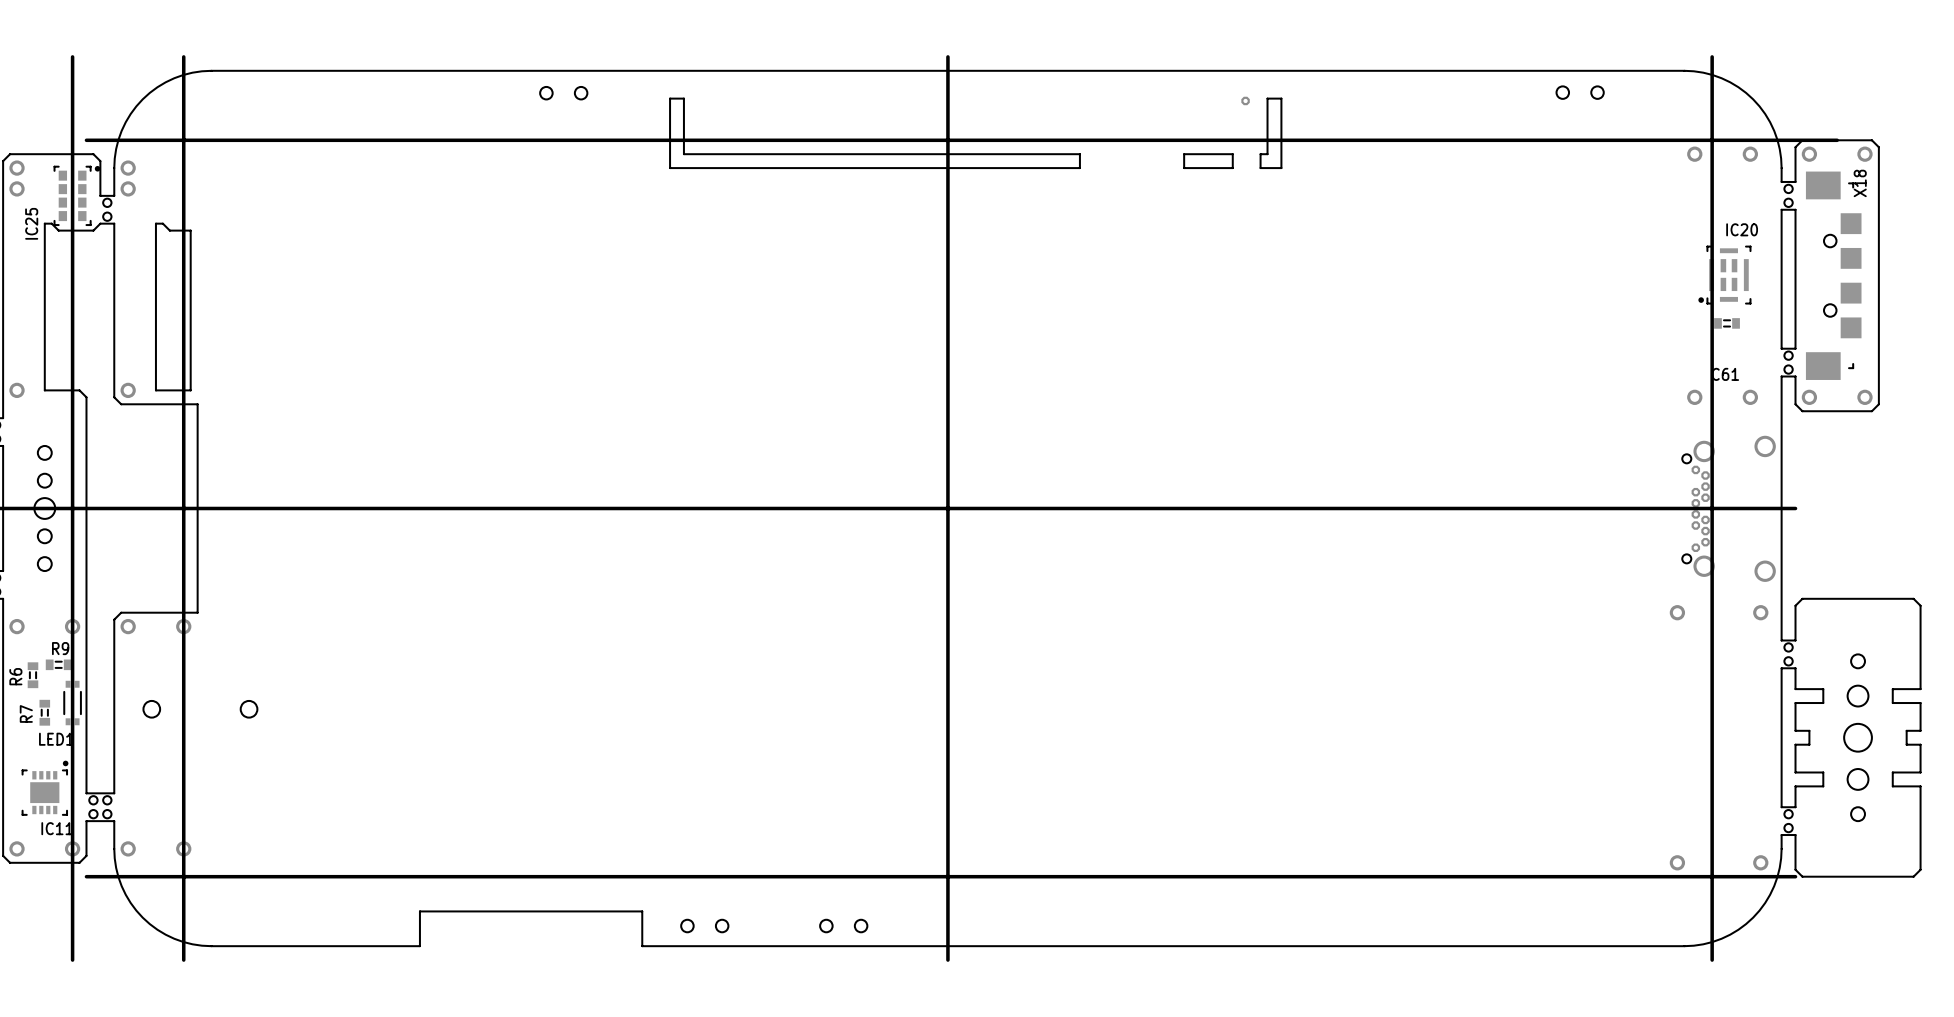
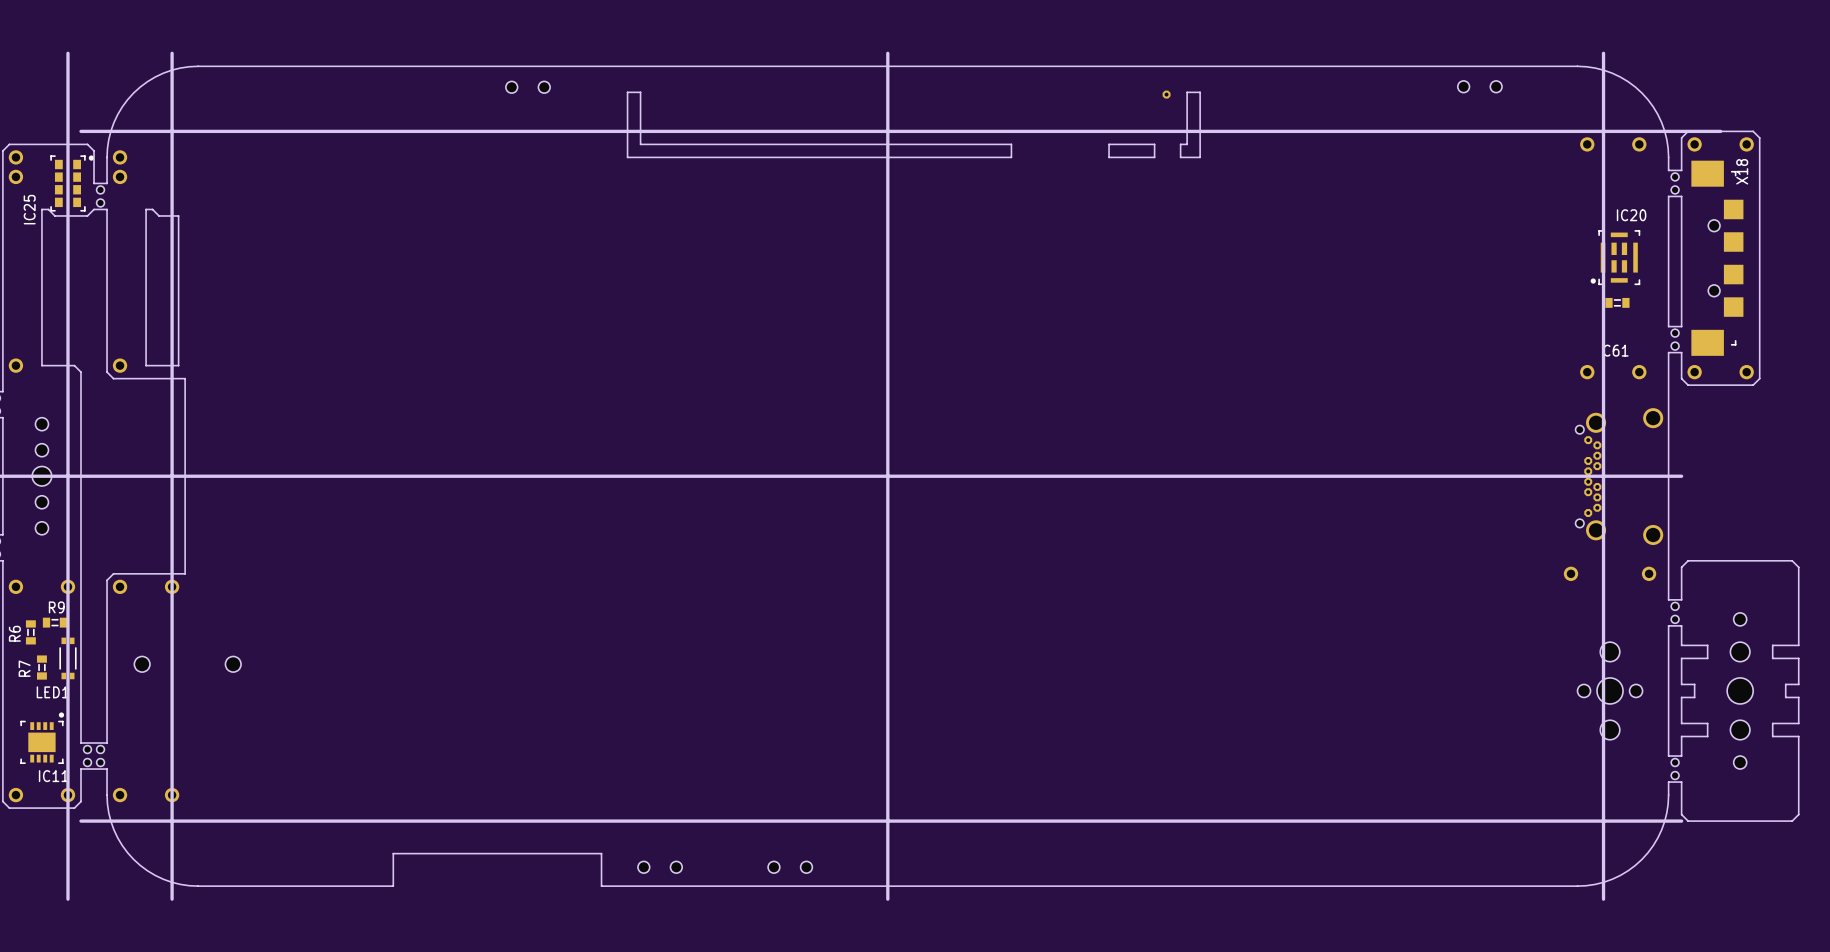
hole: none -> (1610, 651)
hole: none -> (1584, 690)
hole: none -> (1610, 690)
hole: none -> (1636, 690)
hole: none -> (1610, 729)
part: (1677, 862) -> none
part: (1760, 862) -> none

